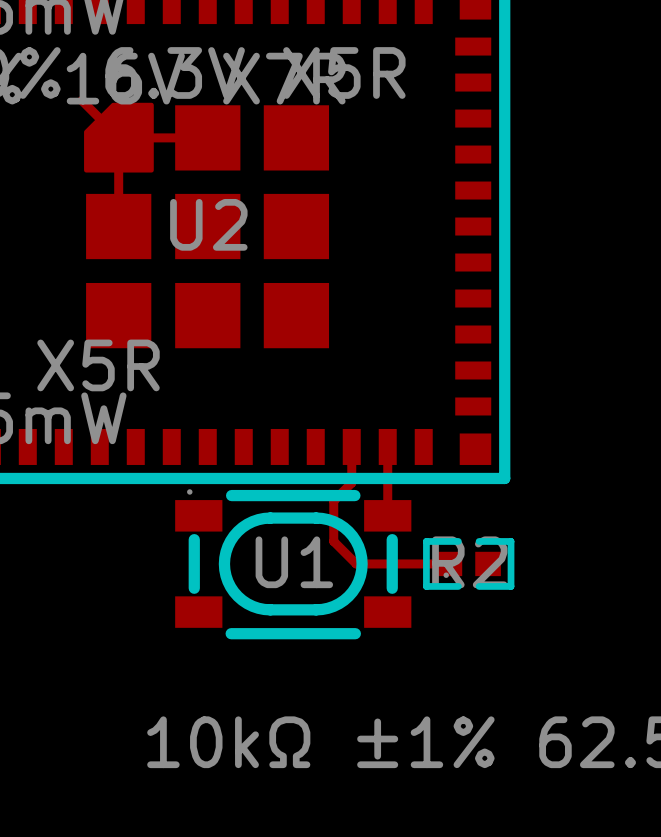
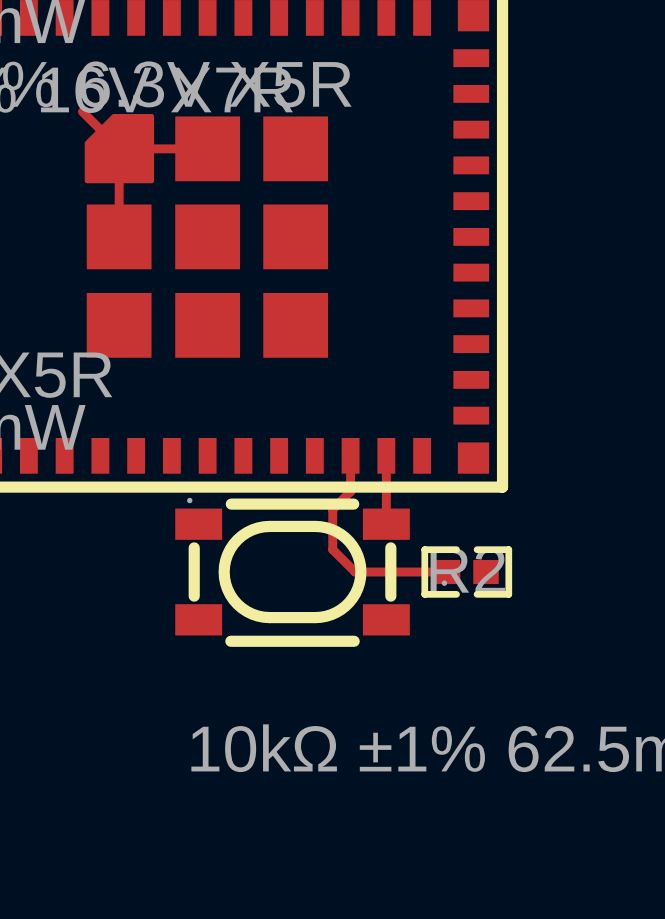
U2 name: U2 (208, 224) -> none
U1: (293, 564) -> none

